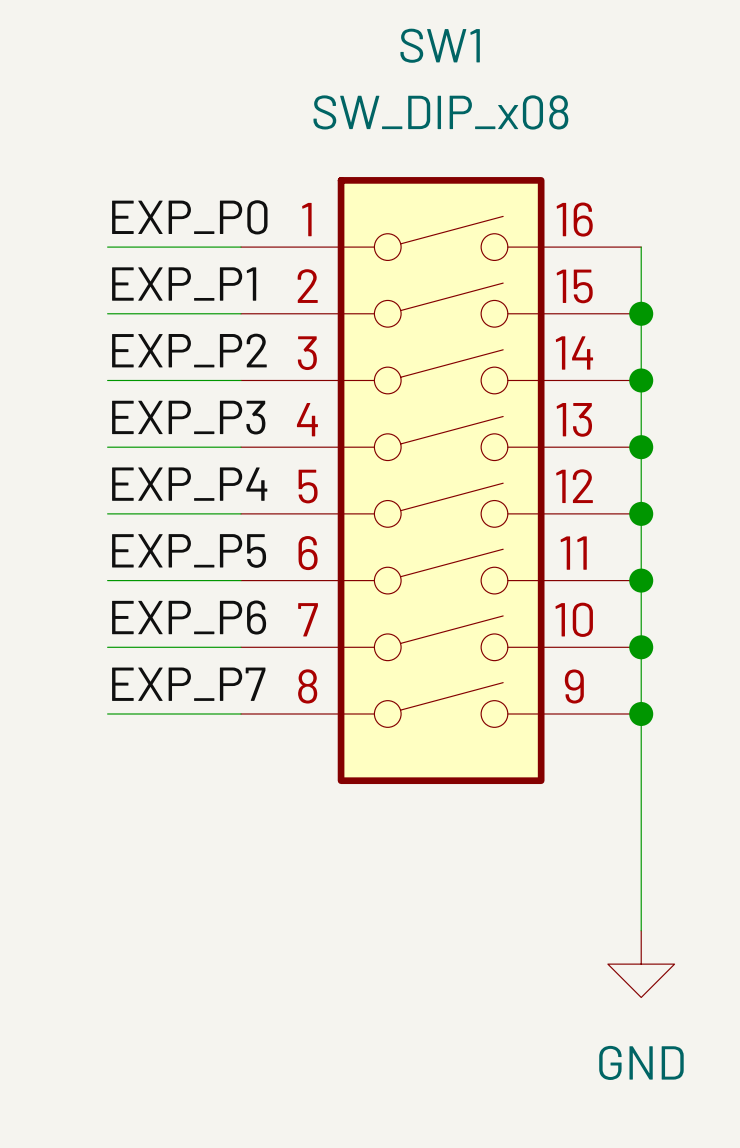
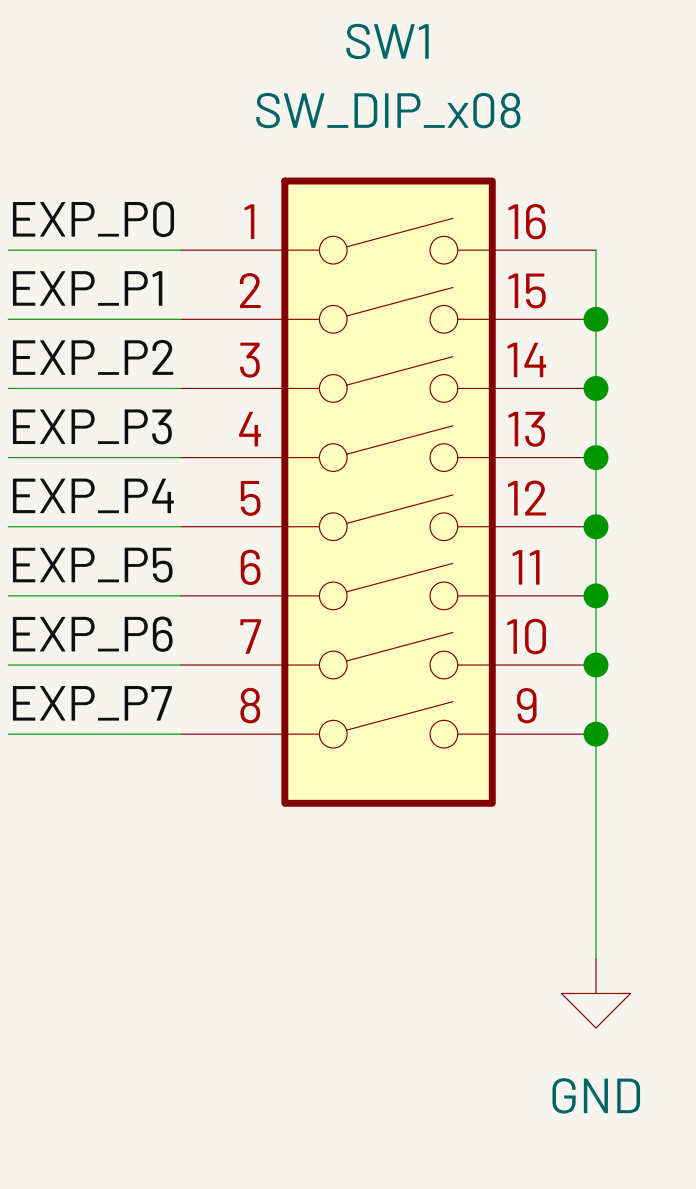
label position: EXP_P0 (189, 217) -> EXP_P0 (93, 219)
wire: none -> (8, 250) (42, 250)
label position: EXP_P1 (184, 284) -> EXP_P1 (87, 288)
wire: none -> (8, 319) (42, 319)
label position: EXP_P2 (189, 350) -> EXP_P2 (93, 357)
wire: none -> (8, 388) (42, 388)
label position: EXP_P3 (188, 417) -> EXP_P3 (92, 426)
wire: none -> (8, 457) (42, 457)
label position: EXP_P4 (189, 484) -> EXP_P4 (93, 495)
wire: none -> (8, 526) (42, 526)
label position: EXP_P5 (189, 550) -> EXP_P5 (92, 565)
wire: none -> (8, 595) (42, 595)
label position: EXP_P6 (189, 617) -> EXP_P6 (92, 634)
wire: none -> (8, 665) (42, 665)
label position: EXP_P7 (188, 684) -> EXP_P7 (92, 703)
wire: none -> (8, 734) (42, 734)

